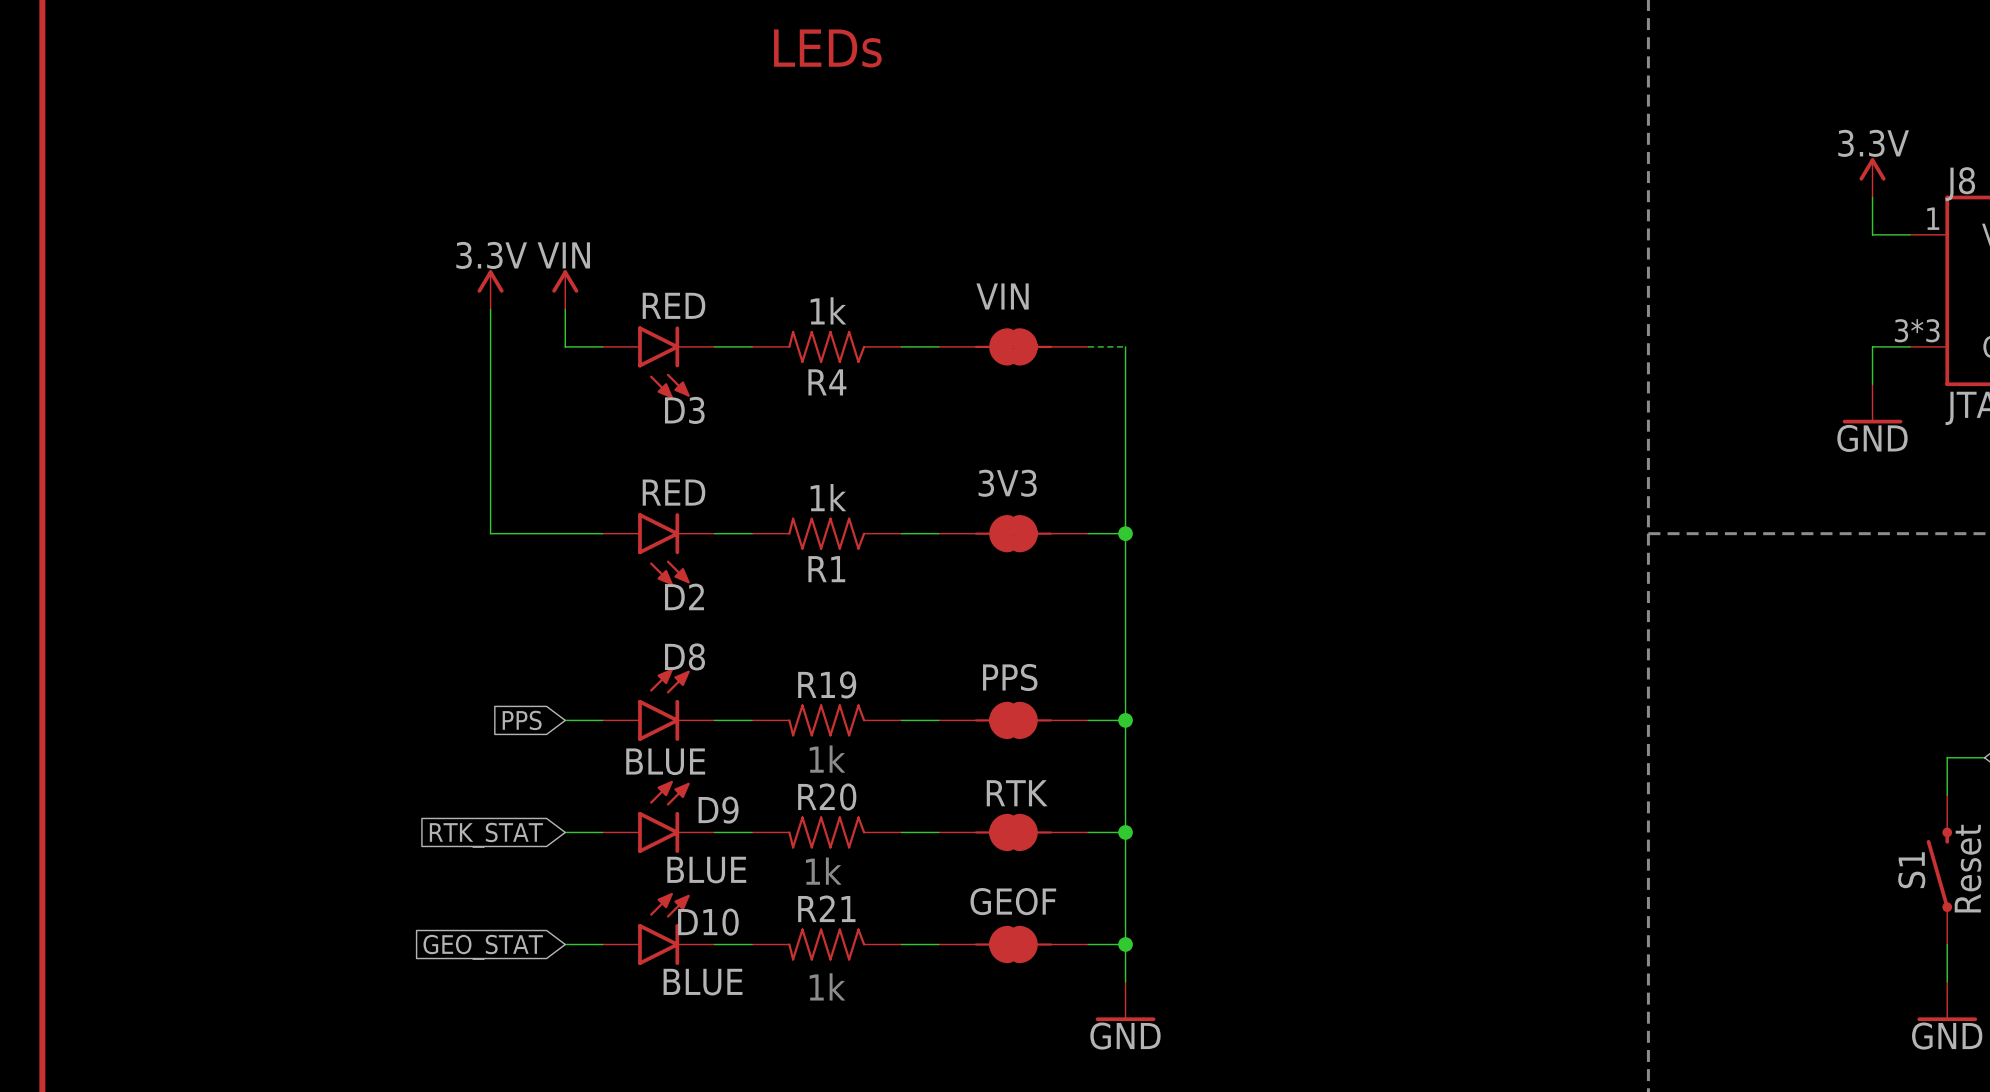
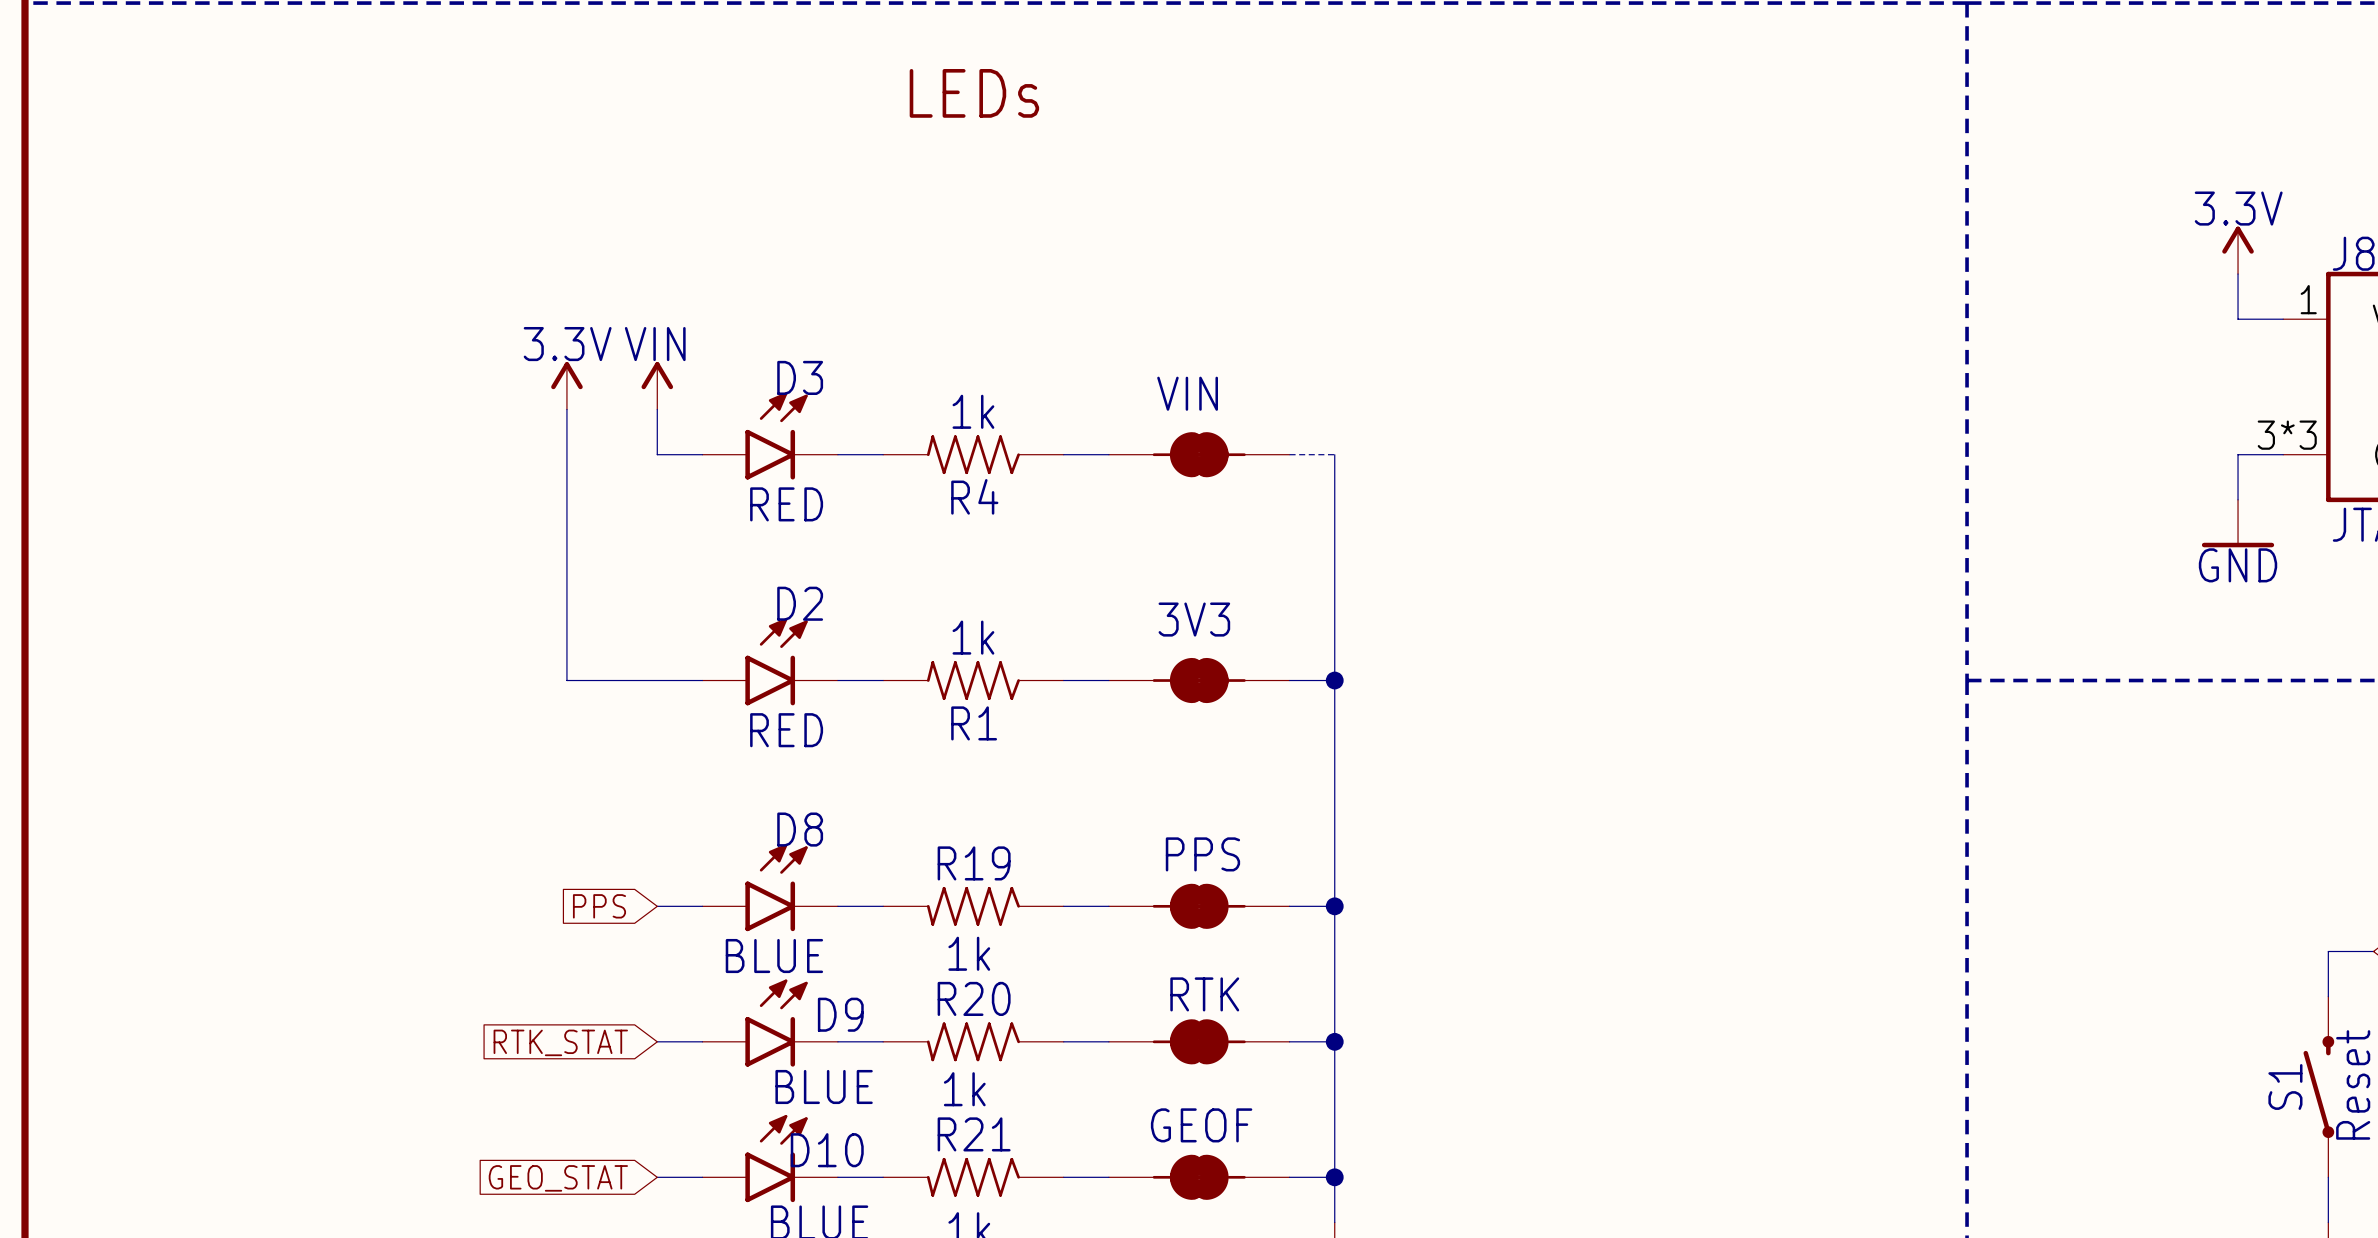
D3 flip: as is (663, 362) -> up-down (776, 435)
D2 flip: as is (663, 549) -> up-down (776, 661)

